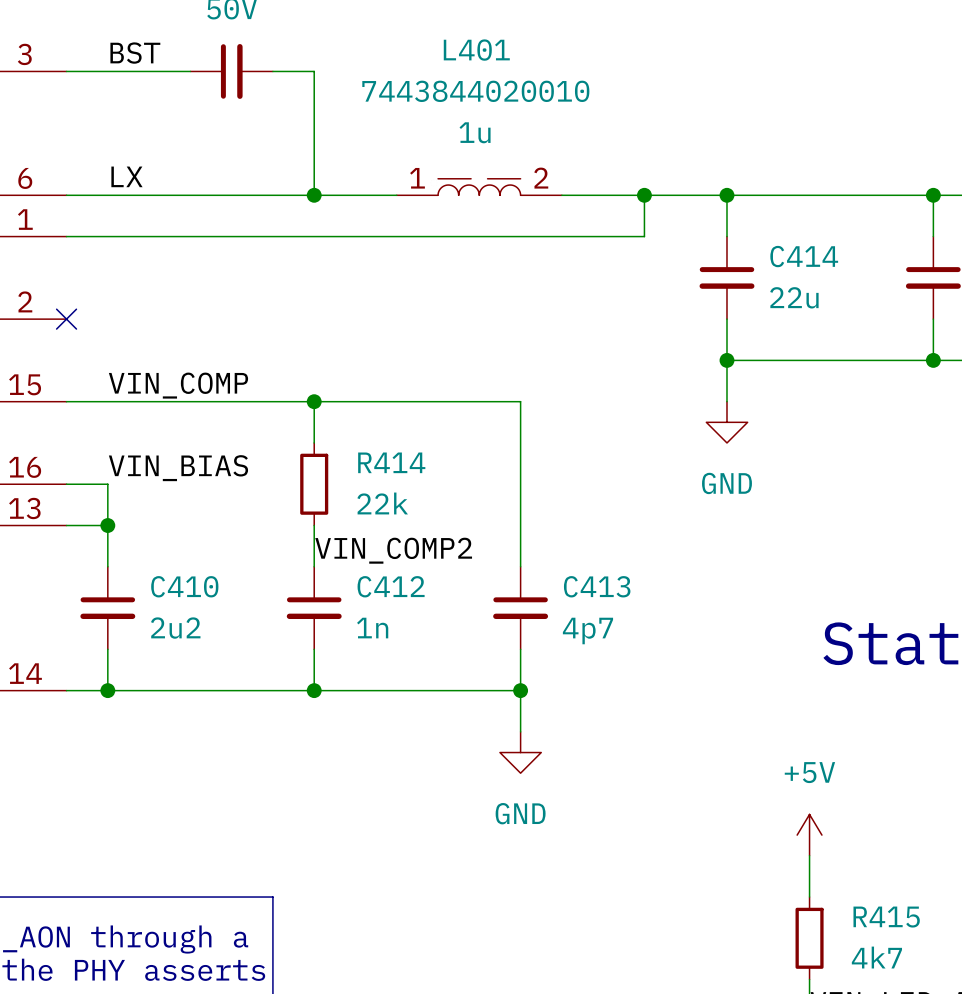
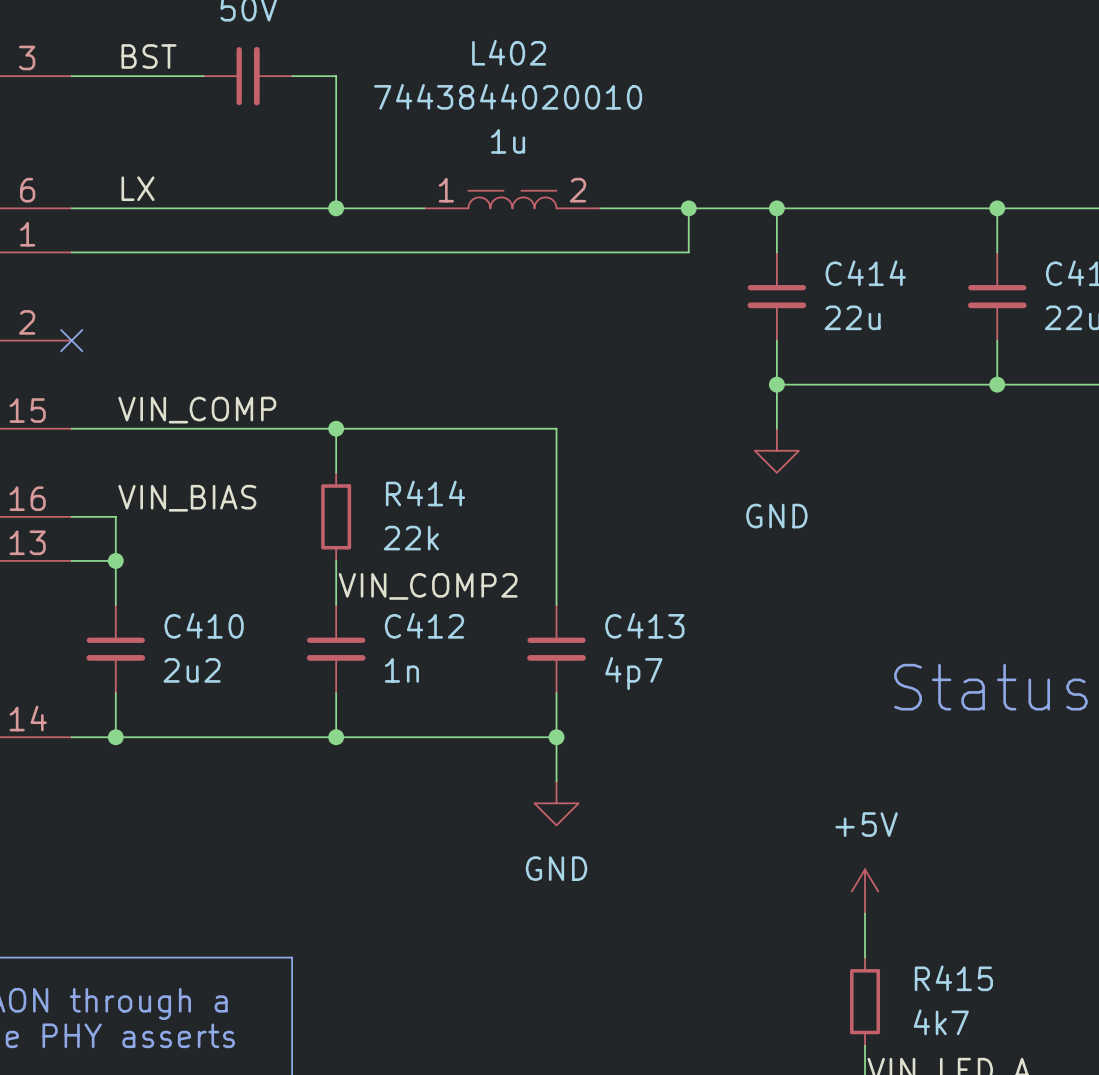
L401 name: L401 (476, 50) -> L402 (509, 52)

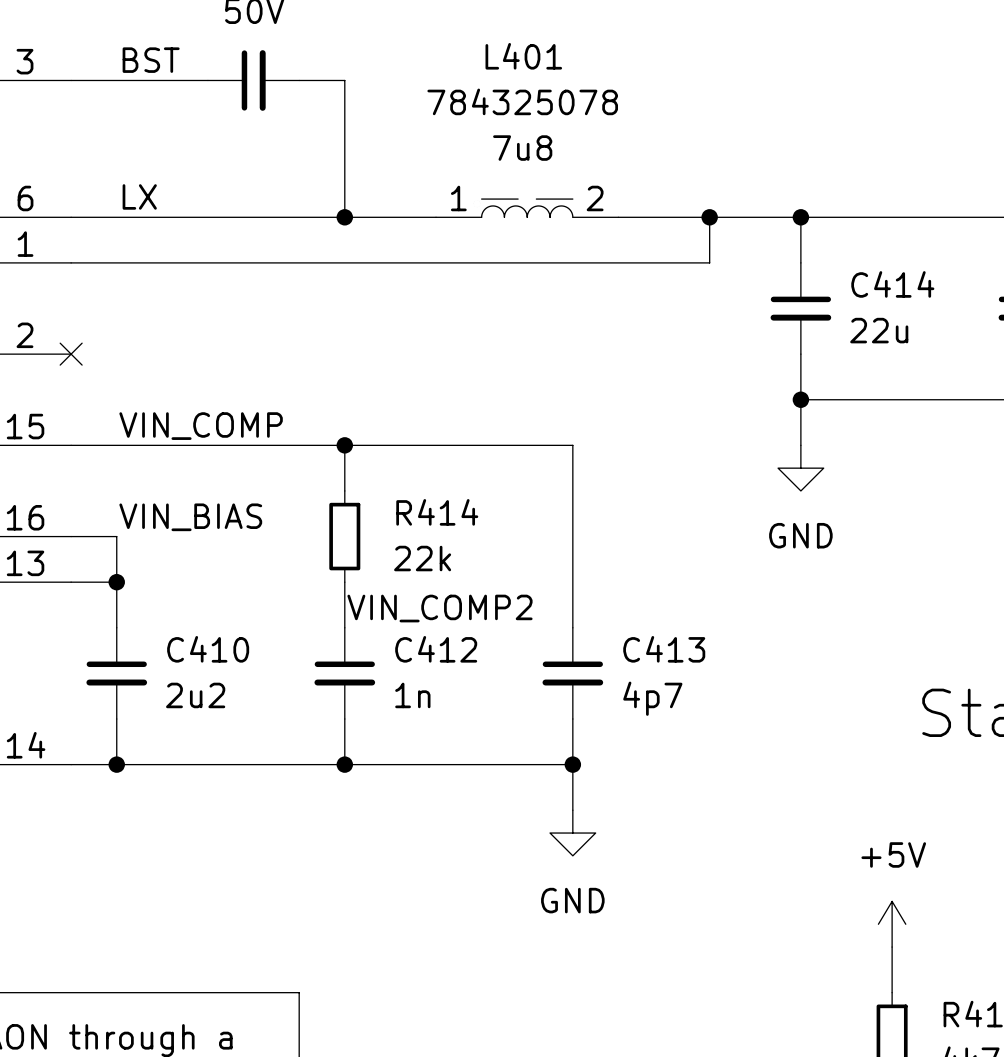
L402 name: L402 (509, 52) -> L401 (523, 56)
L402 value: 7443844020010 (508, 96) -> 784325078 (522, 101)
L402 text: 1u (508, 141) -> none
L402 text: none -> 7u8 (522, 148)

